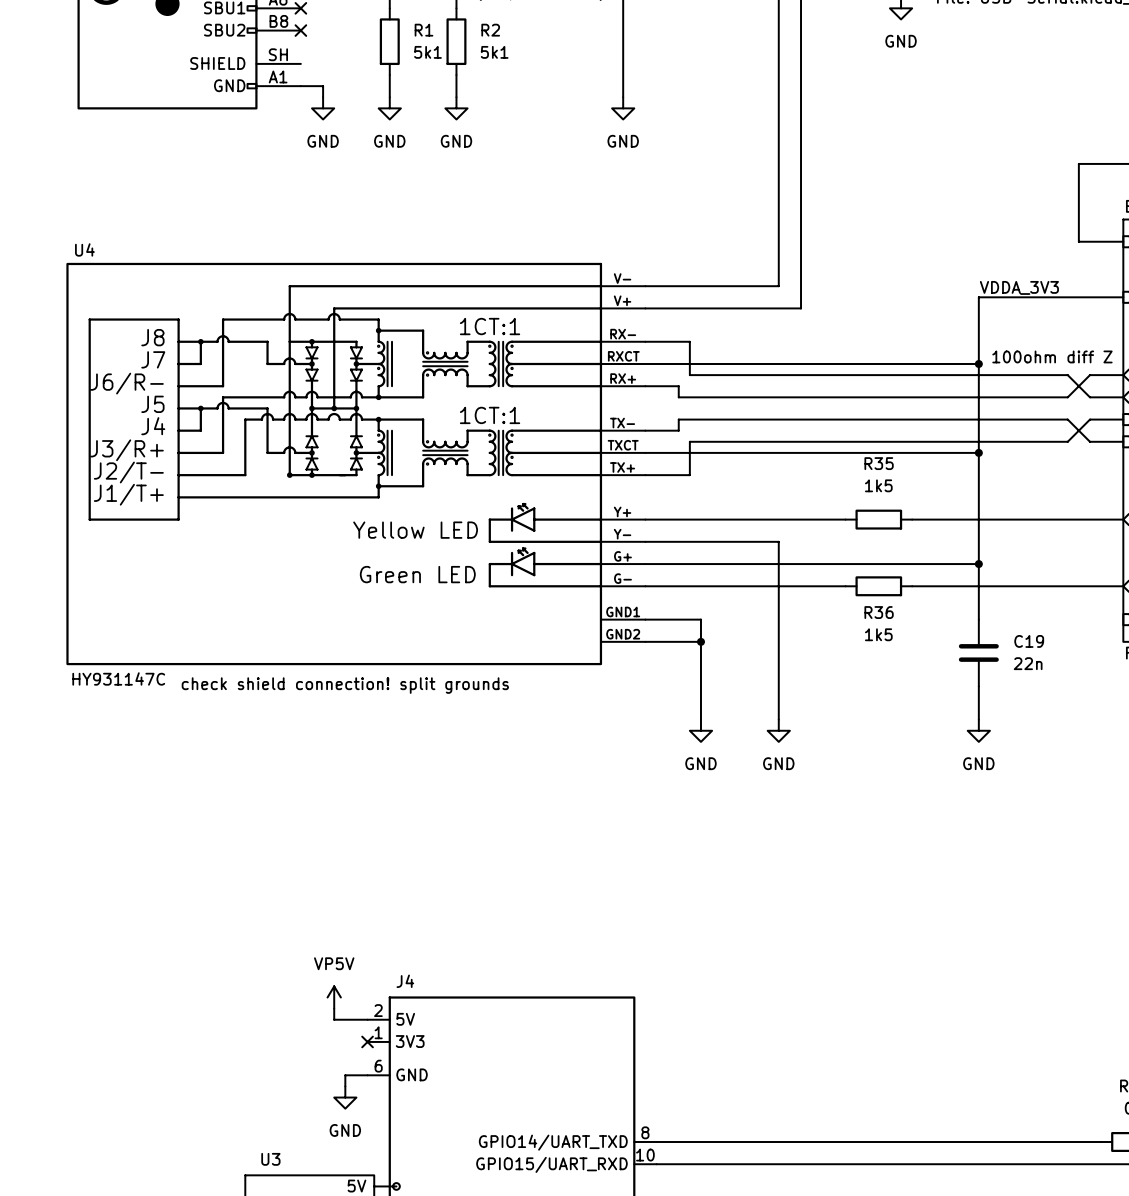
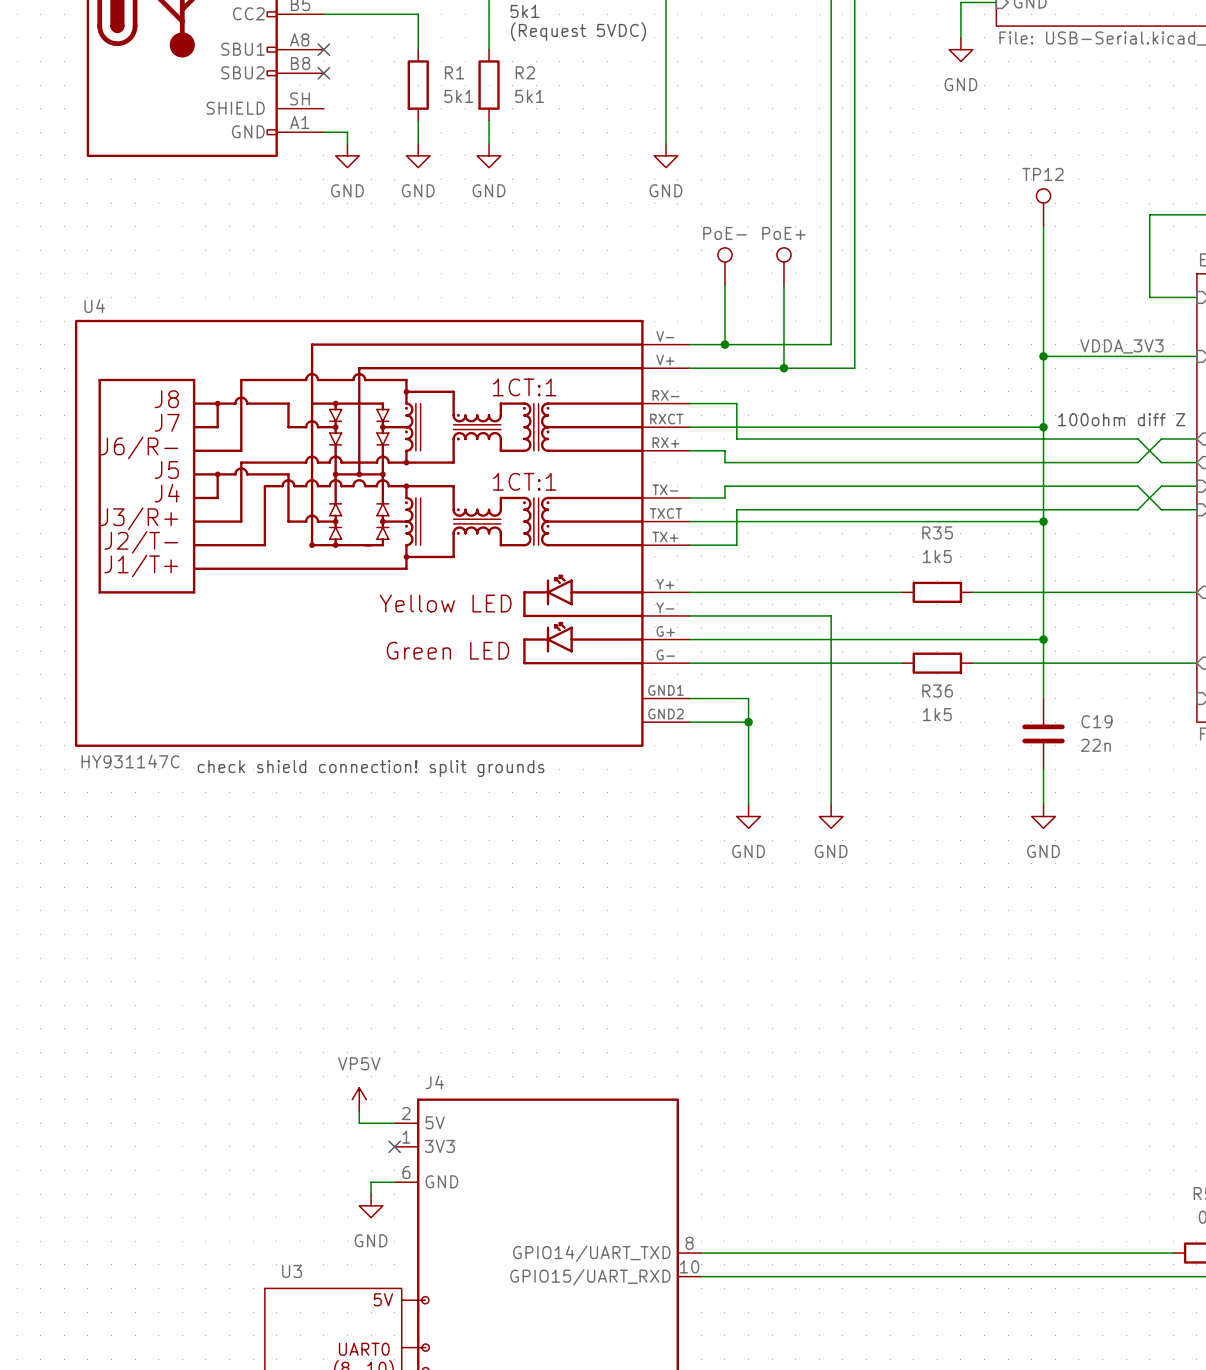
TP12: none -> (1043, 207)
wire: none -> (1043, 226) (1043, 356)
PoE-: none -> (724, 266)
PoE+: none -> (783, 266)
wire: none -> (724, 285) (724, 344)
wire: none -> (783, 285) (783, 368)
junction: none -> (724, 344)
label position: VDDA_3V3 (1019, 287) -> VDDA_3V3 (1121, 346)
junction: none -> (1043, 356)
junction: none -> (783, 368)

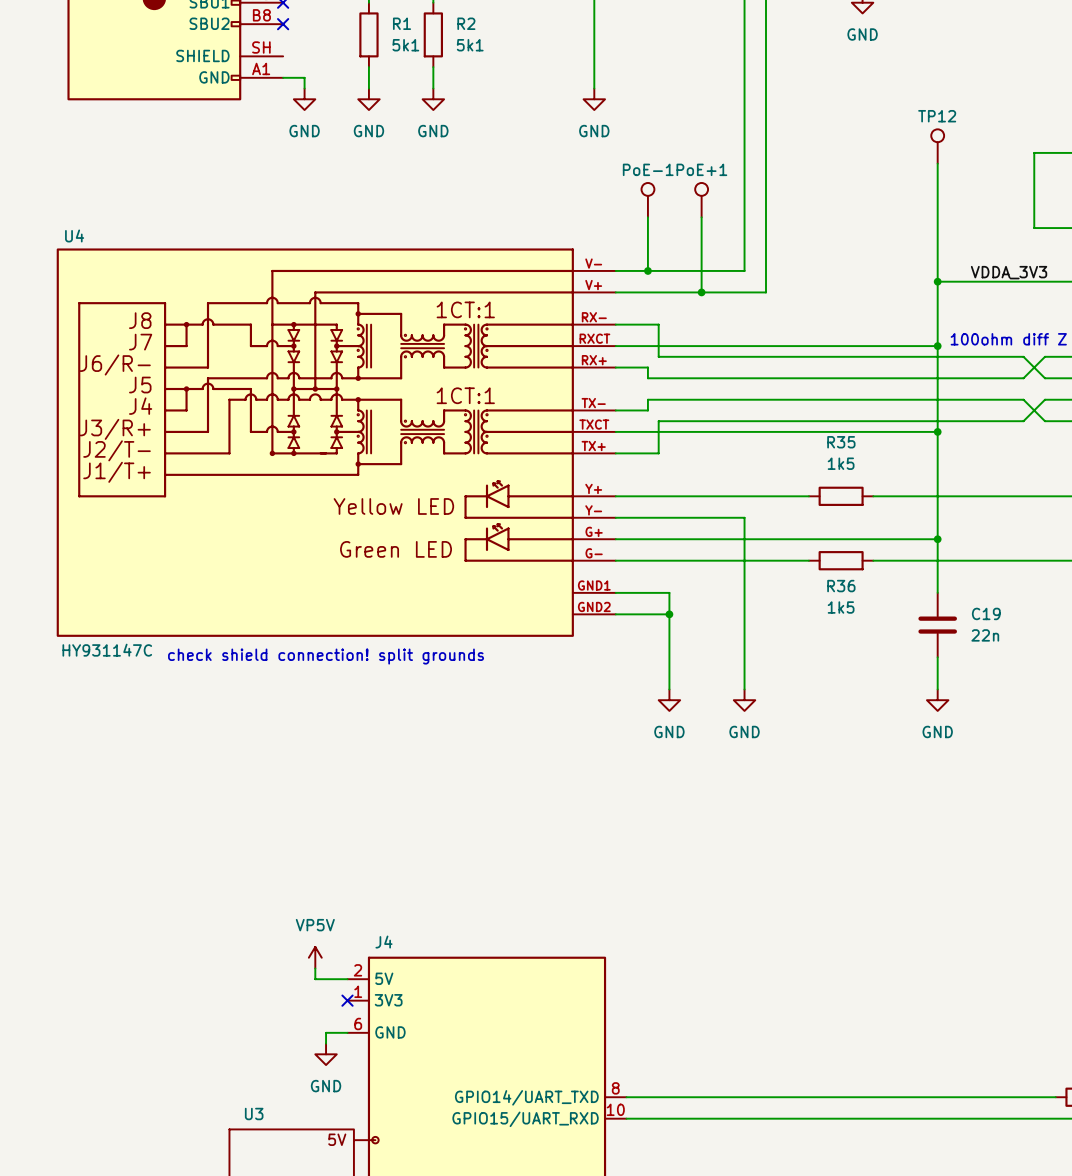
PoE- name: PoE- (724, 233) -> PoE-1 (648, 169)
PoE+ name: PoE+ (783, 233) -> PoE+1 (701, 169)

